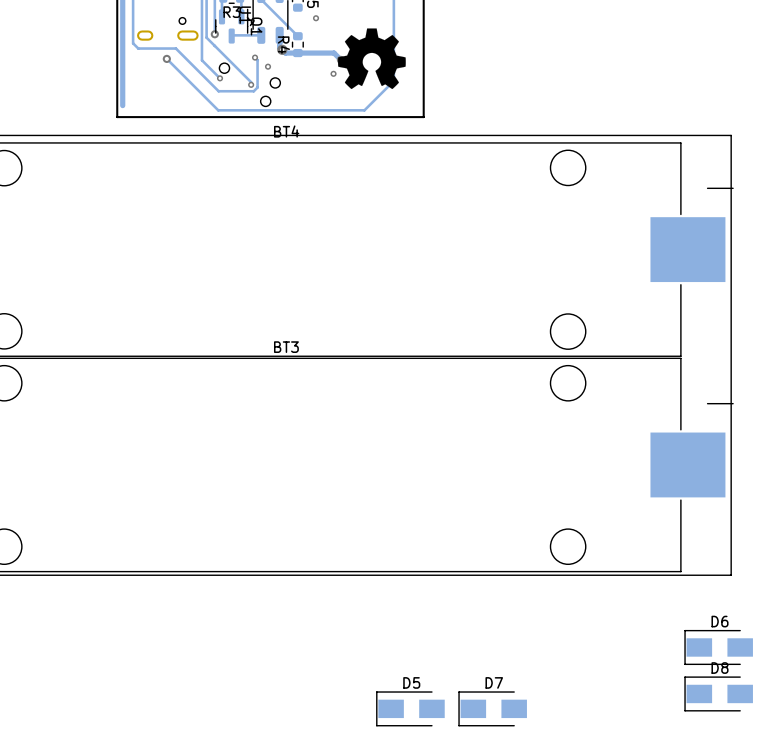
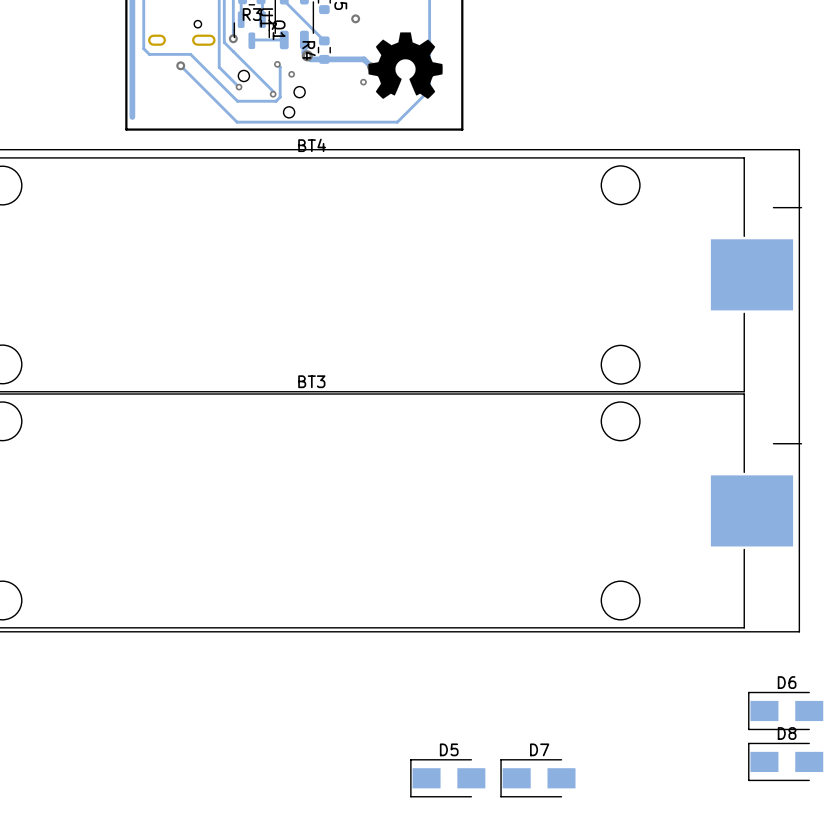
via: none -> (355, 18)
via: (316, 18) -> none

